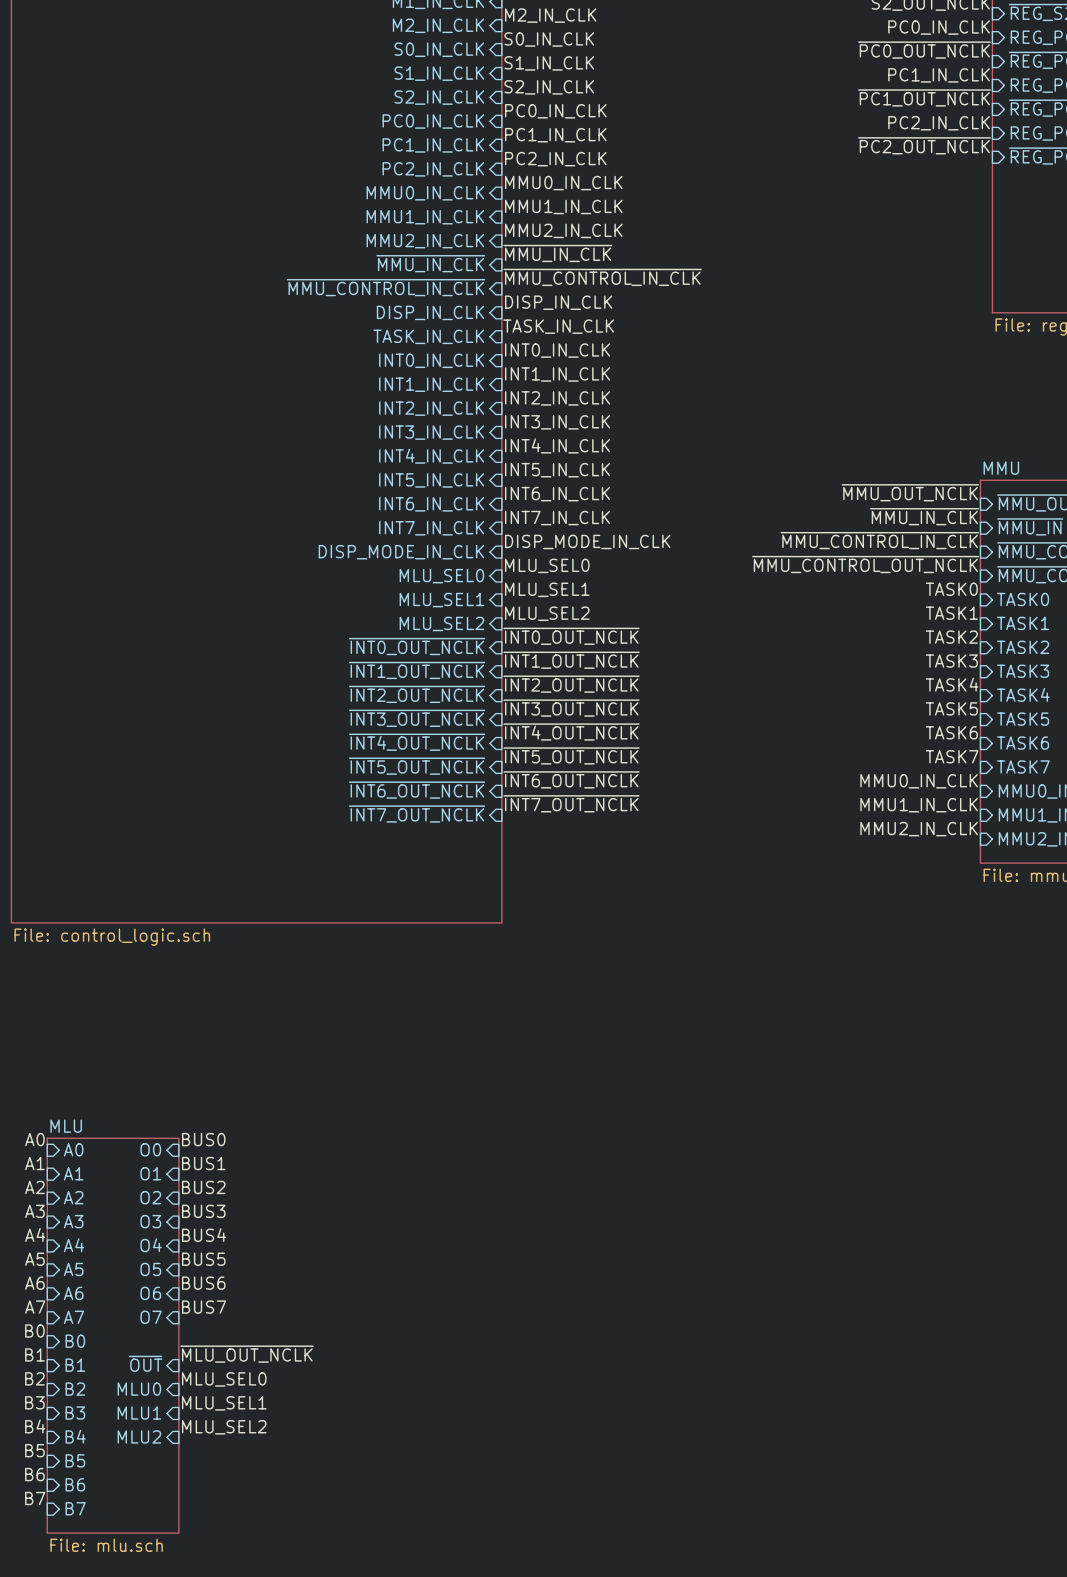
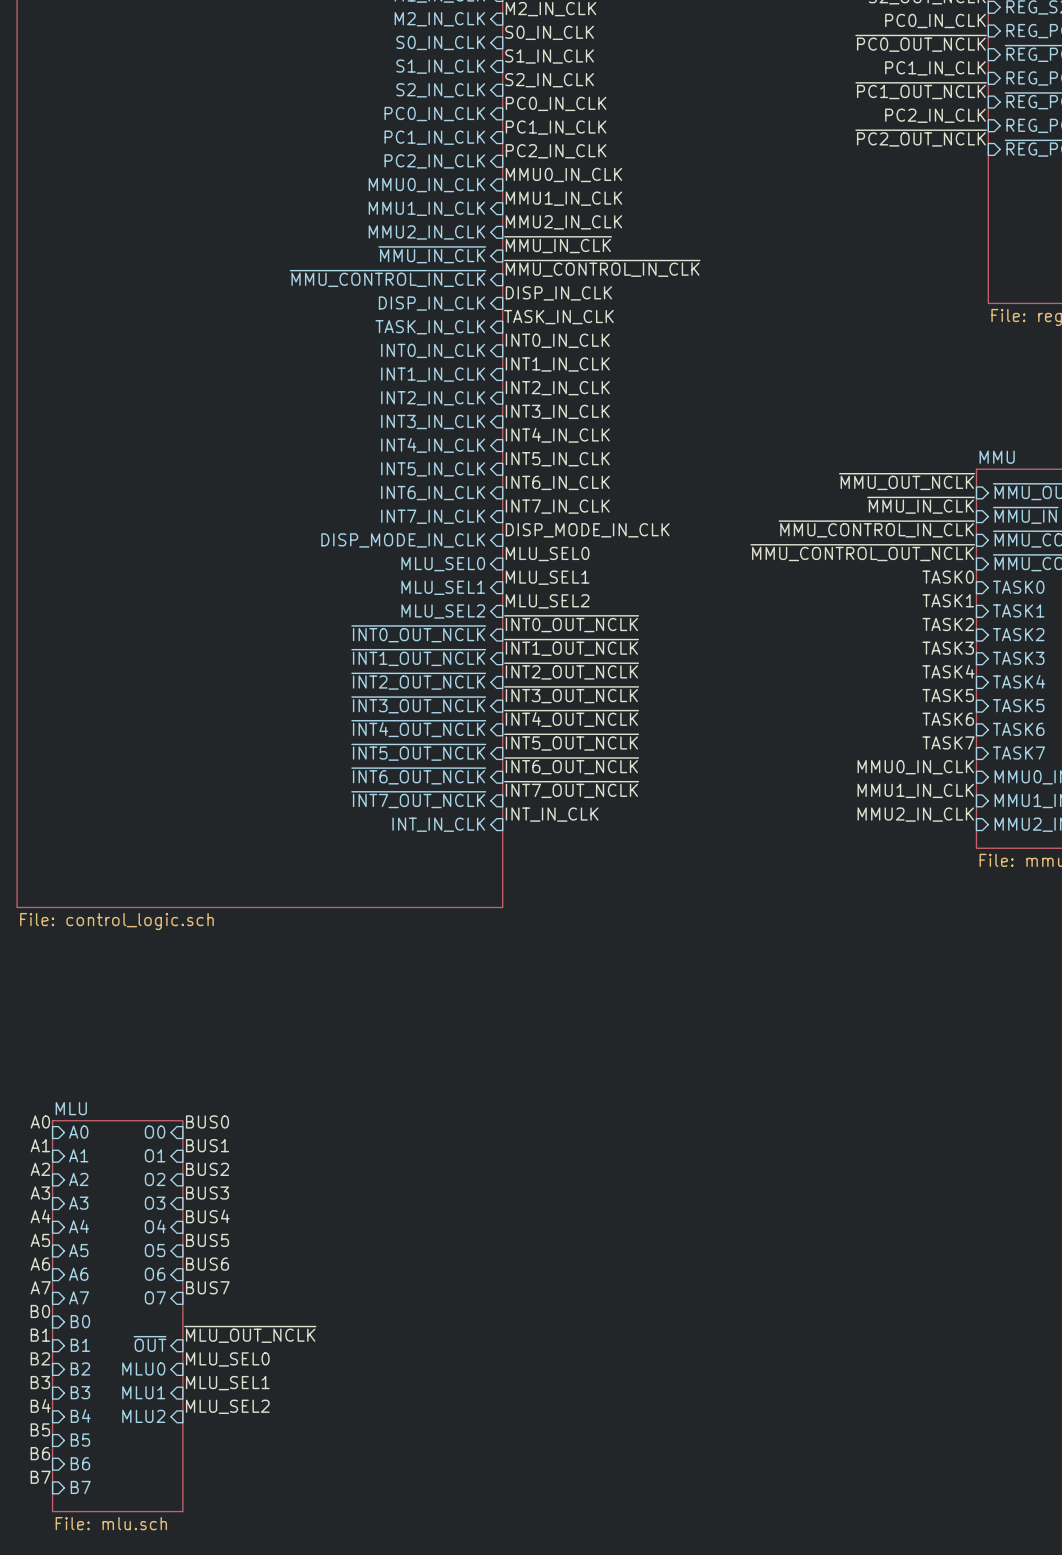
label: none -> INT_IN_CLK (552, 814)
sheet pin: none -> INT_IN_CLK (438, 824)

